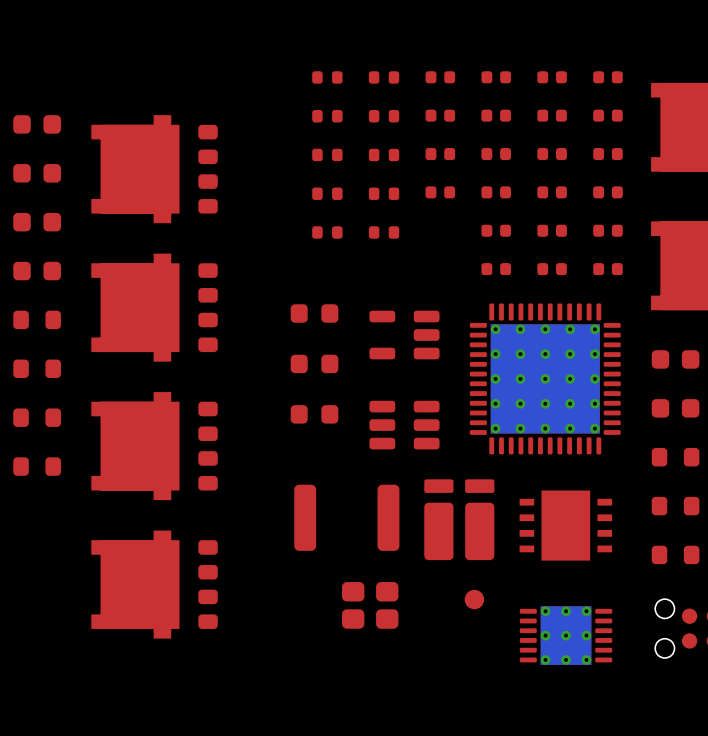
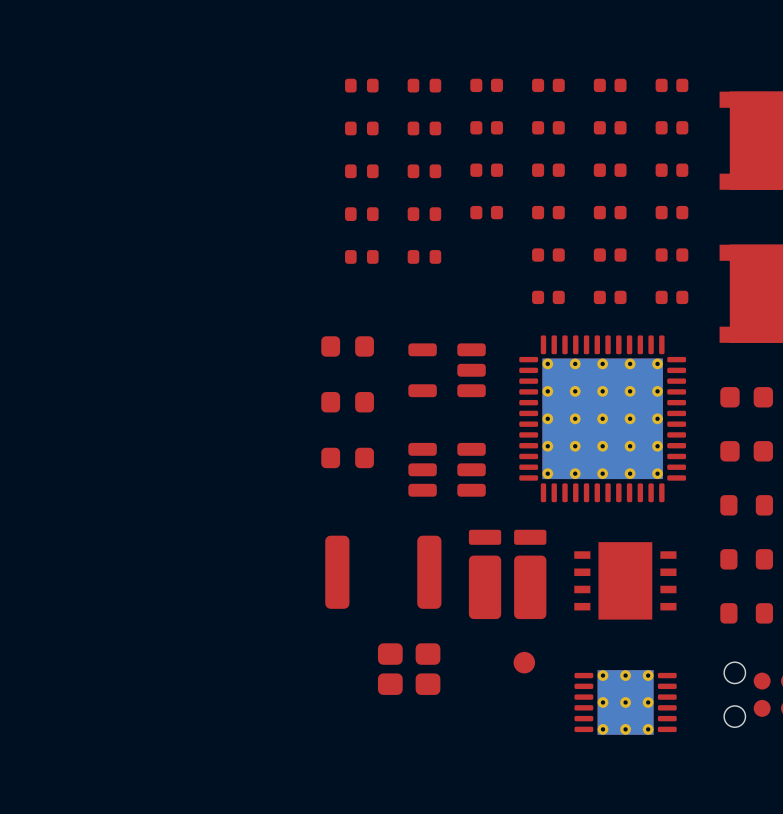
part: (37, 124) -> none
part: (154, 169) -> none
part: (37, 173) -> none
part: (37, 222) -> none
part: (37, 271) -> none
part: (154, 307) -> none
part: (37, 319) -> none
part: (37, 368) -> none
part: (37, 417) -> none
part: (154, 446) -> none
part: (37, 466) -> none
part: (154, 584) -> none

